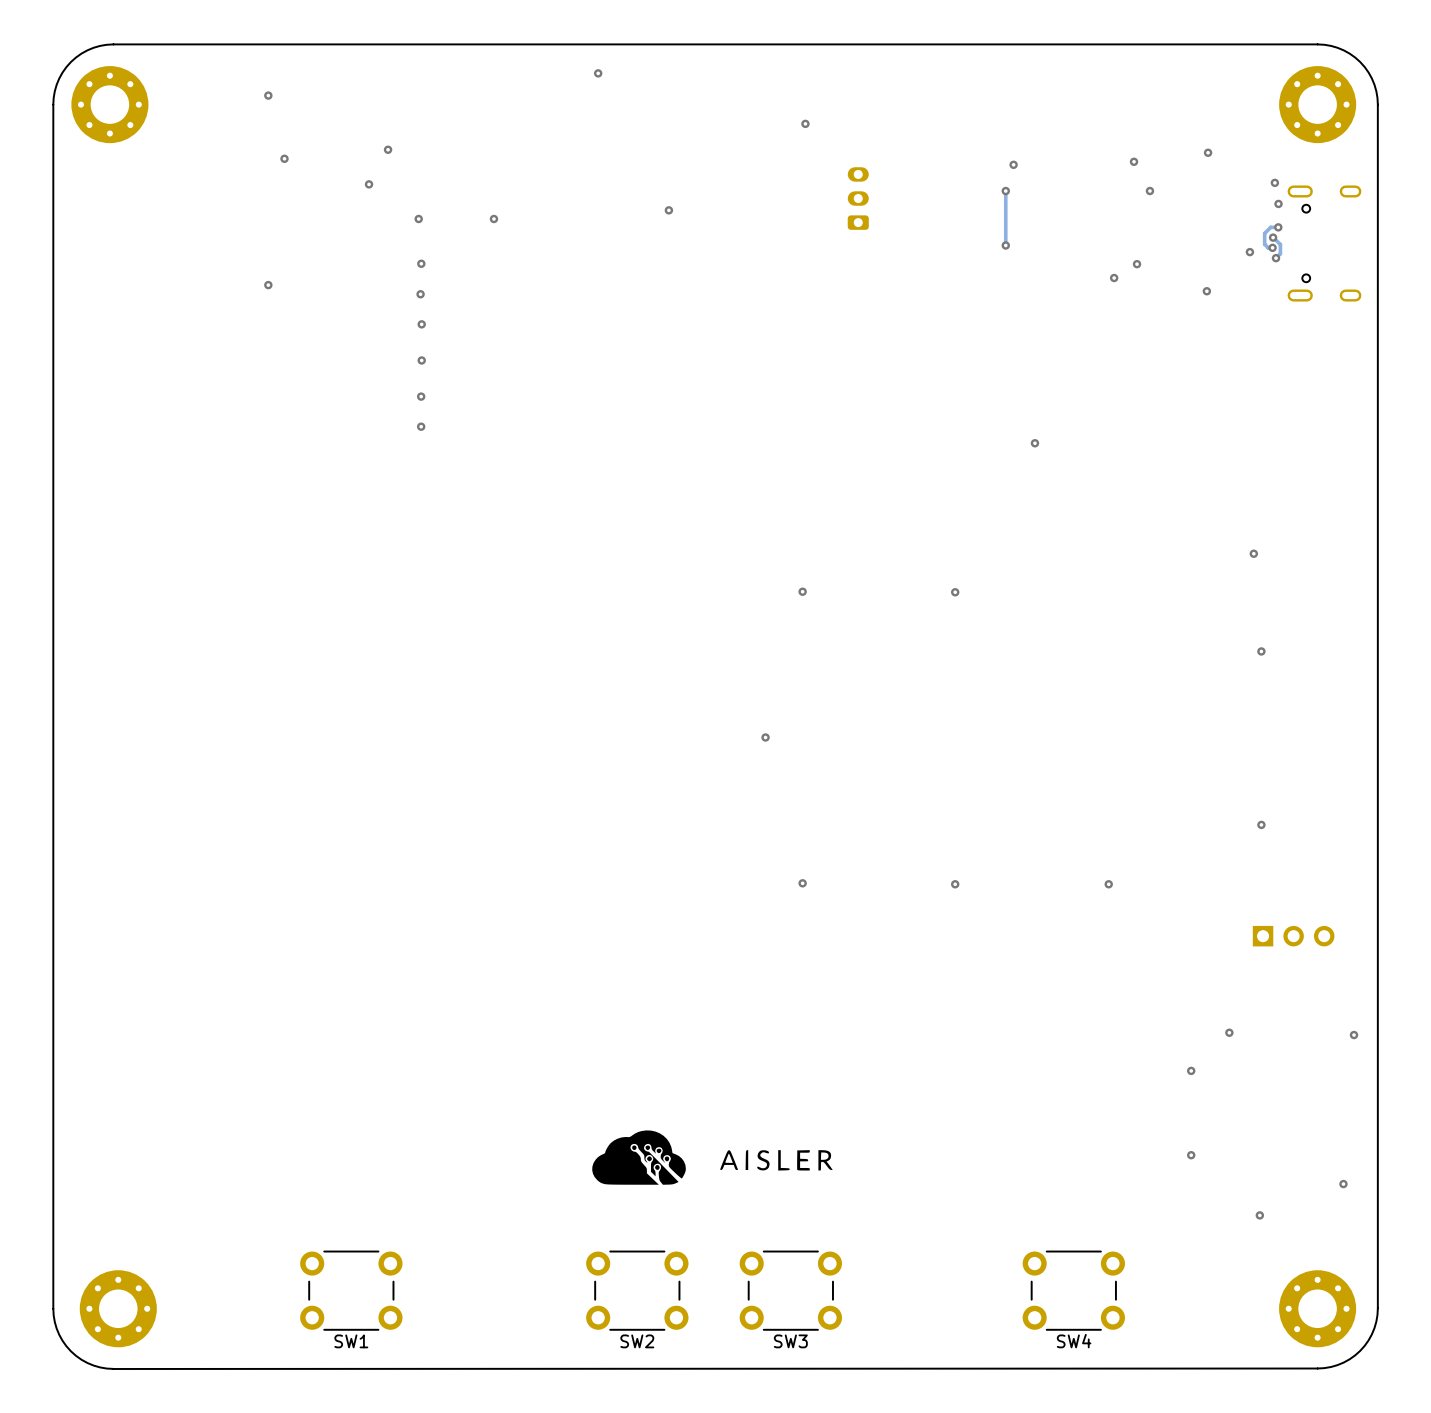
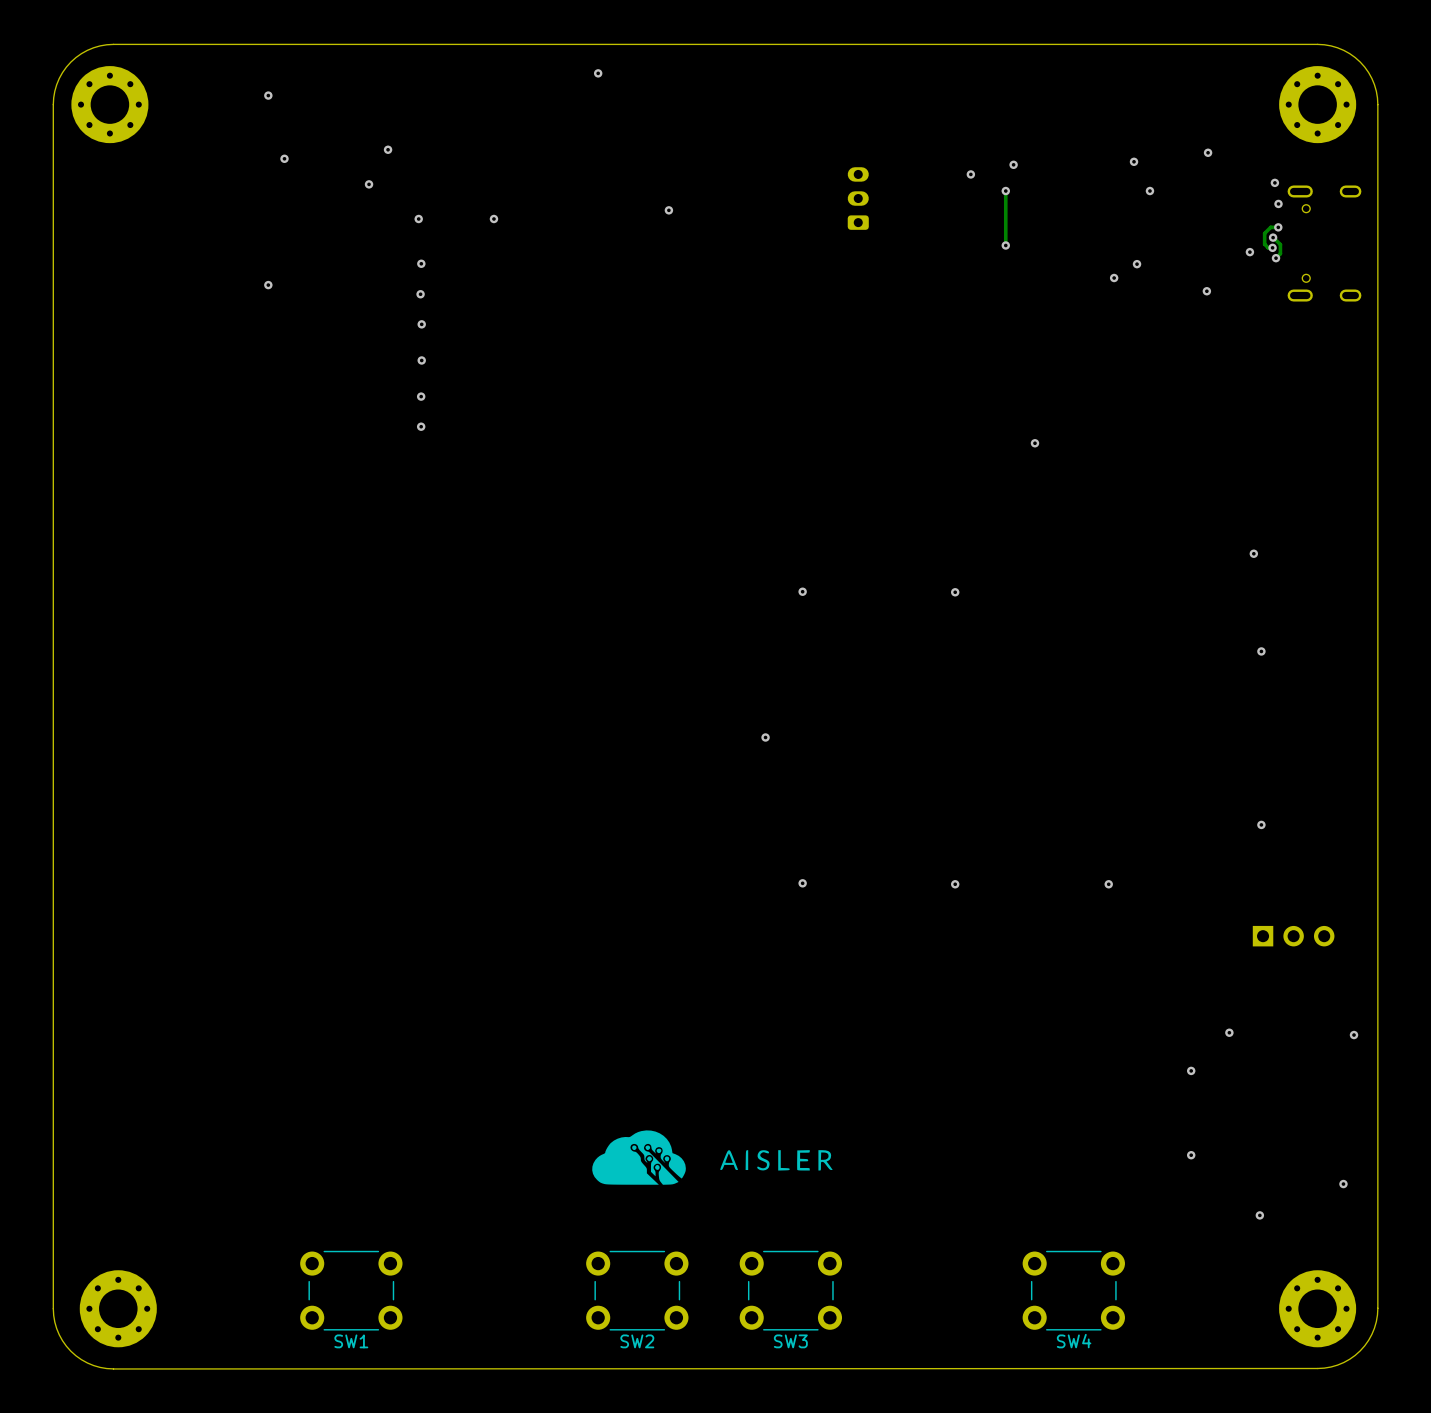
via: (805, 123) -> none
via: none -> (970, 174)

